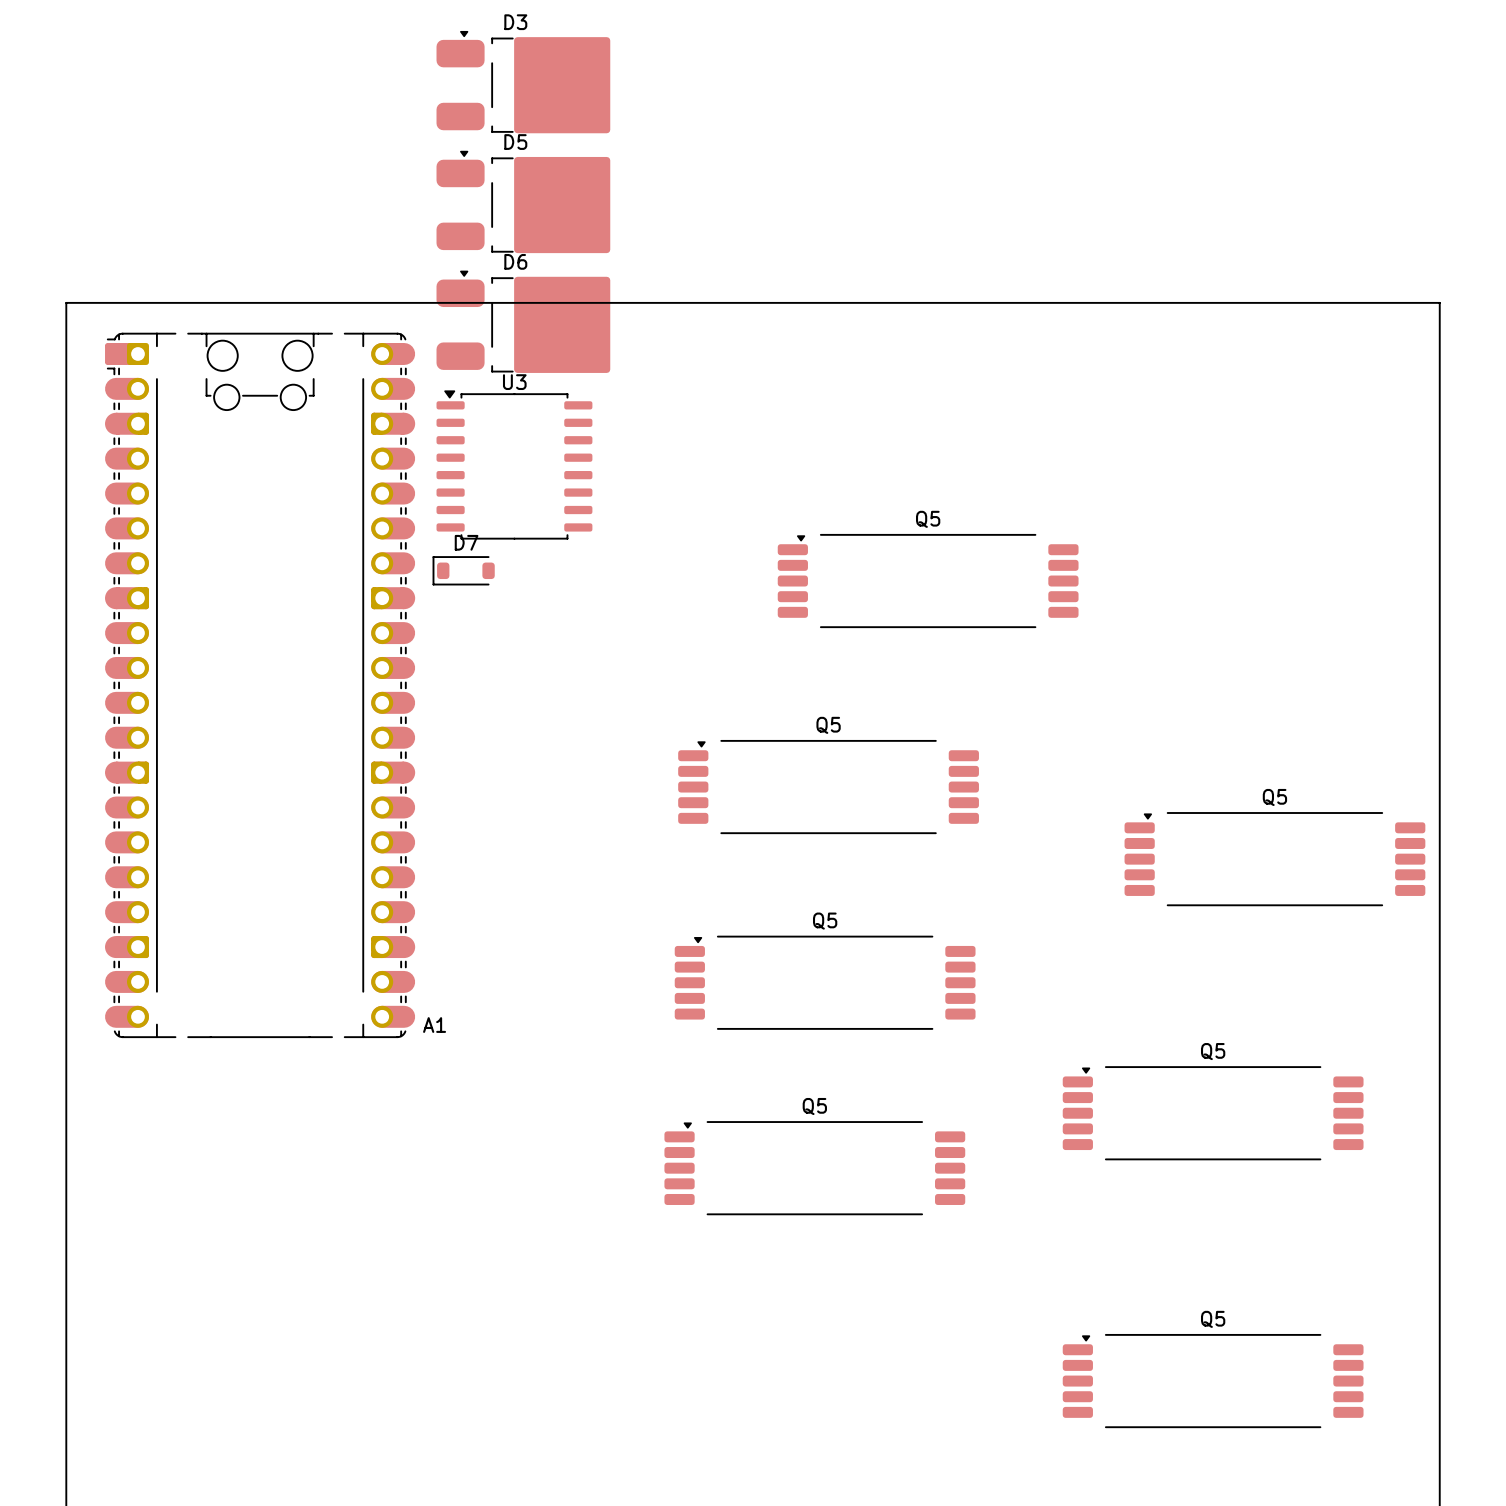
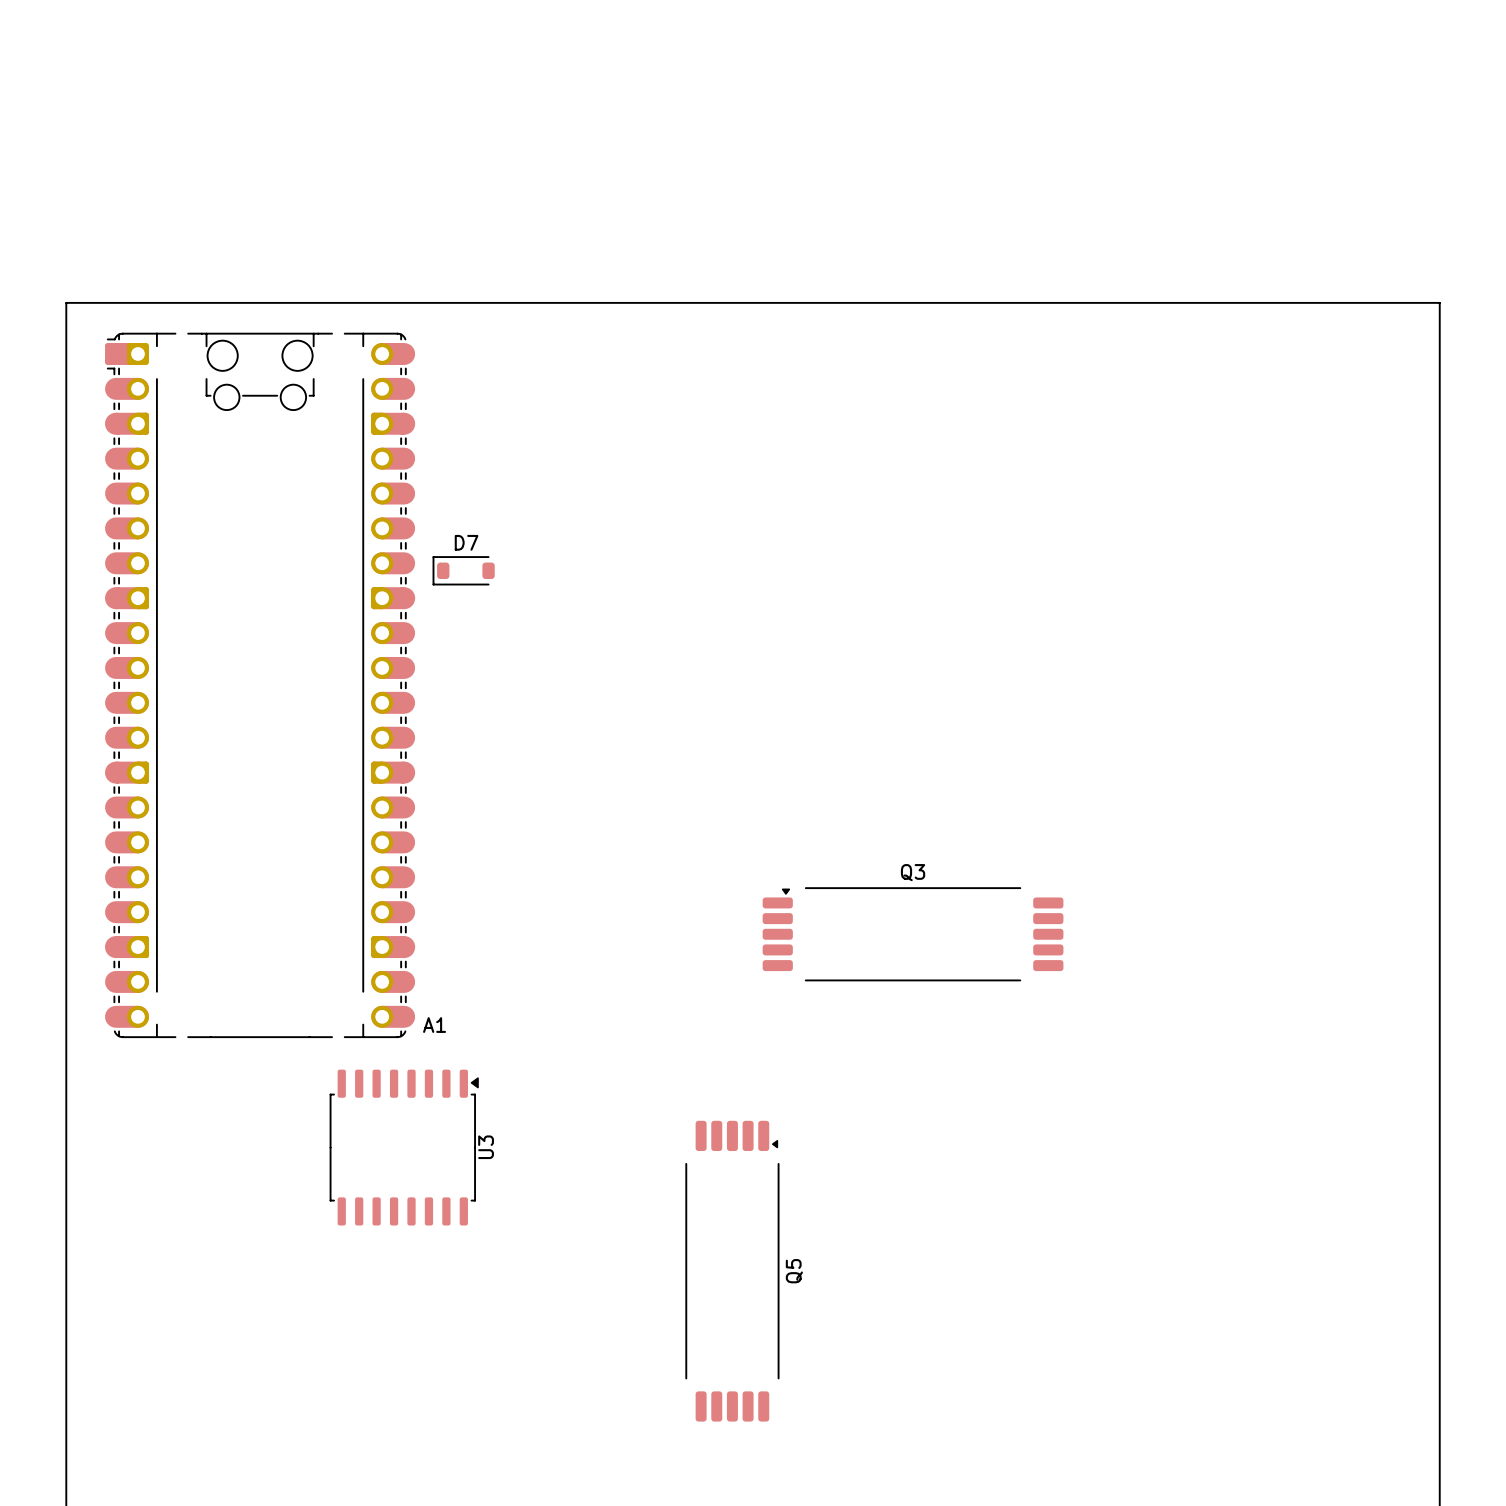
D3: (523, 82) -> none
D5: (523, 201) -> none
D6: (523, 321) -> none
U3 rotation: 0° (514, 464) -> 90° clockwise (404, 1147)
U3 position: (514, 464) -> (404, 1147)
Q5: (928, 581) -> none
Q5: (828, 787) -> none
Q5: (1274, 859) -> none
Q3: none -> (913, 934)
Q5: (825, 982) -> none
Q5: (1213, 1113) -> none
Q5 rotation: 0° (814, 1168) -> 90° clockwise (732, 1271)
Q5: (1213, 1381) -> none

